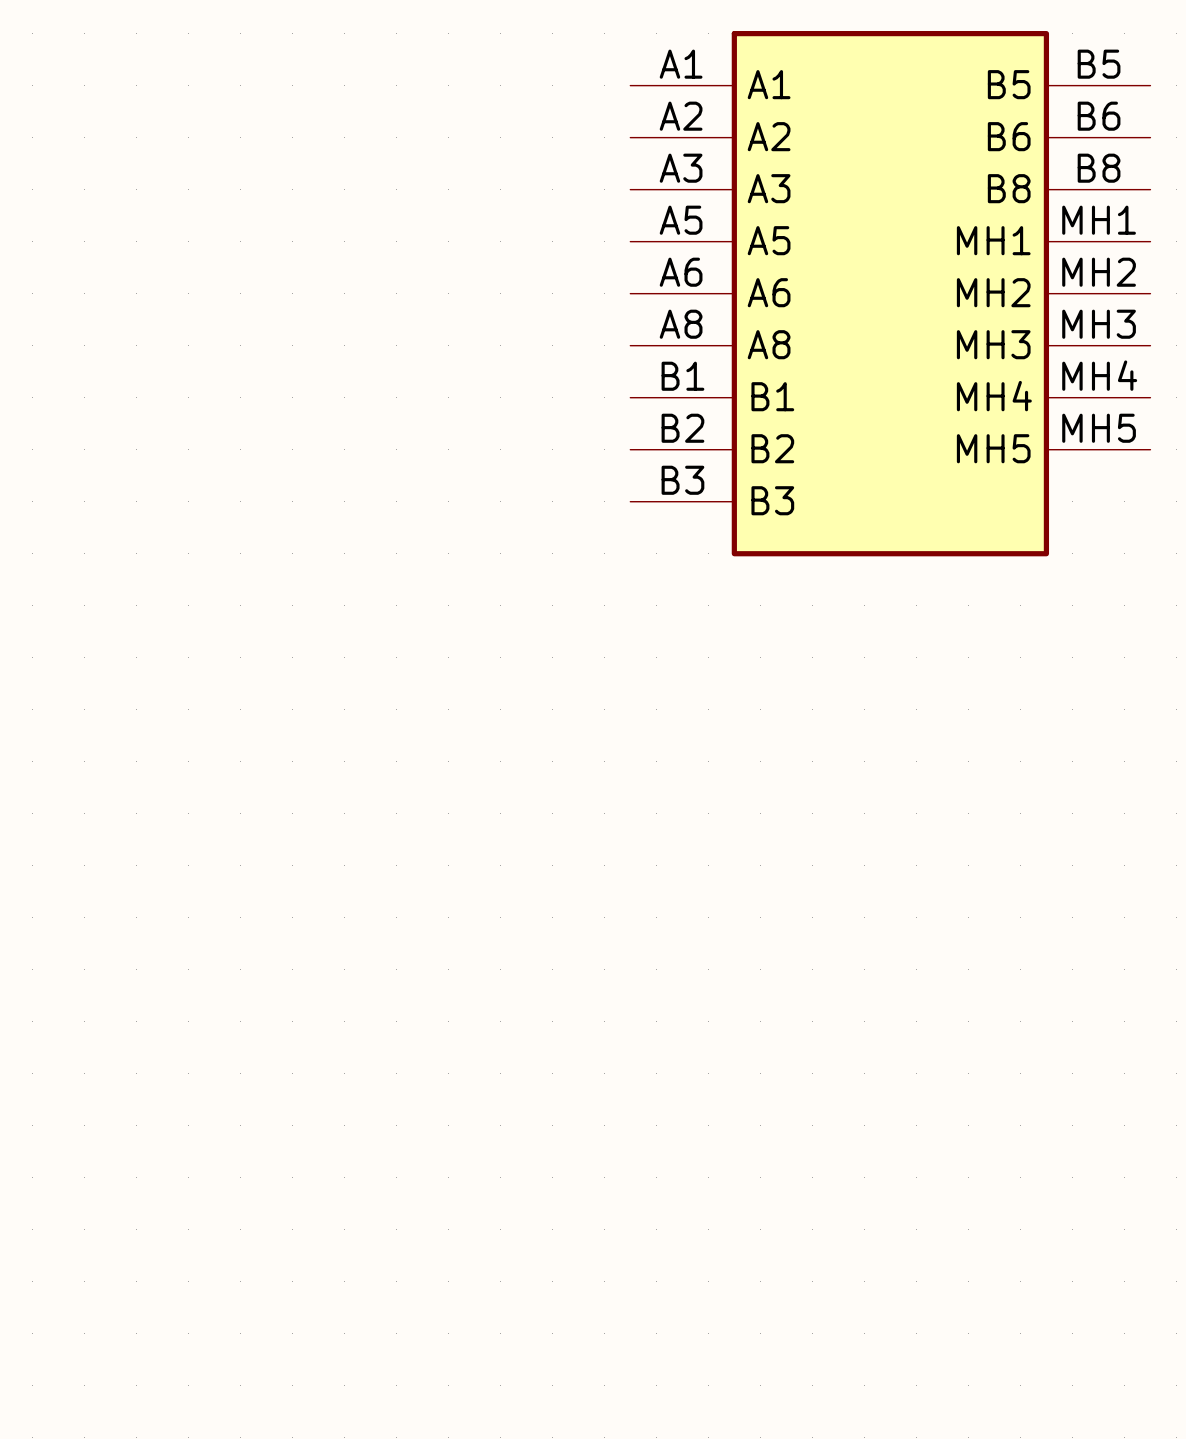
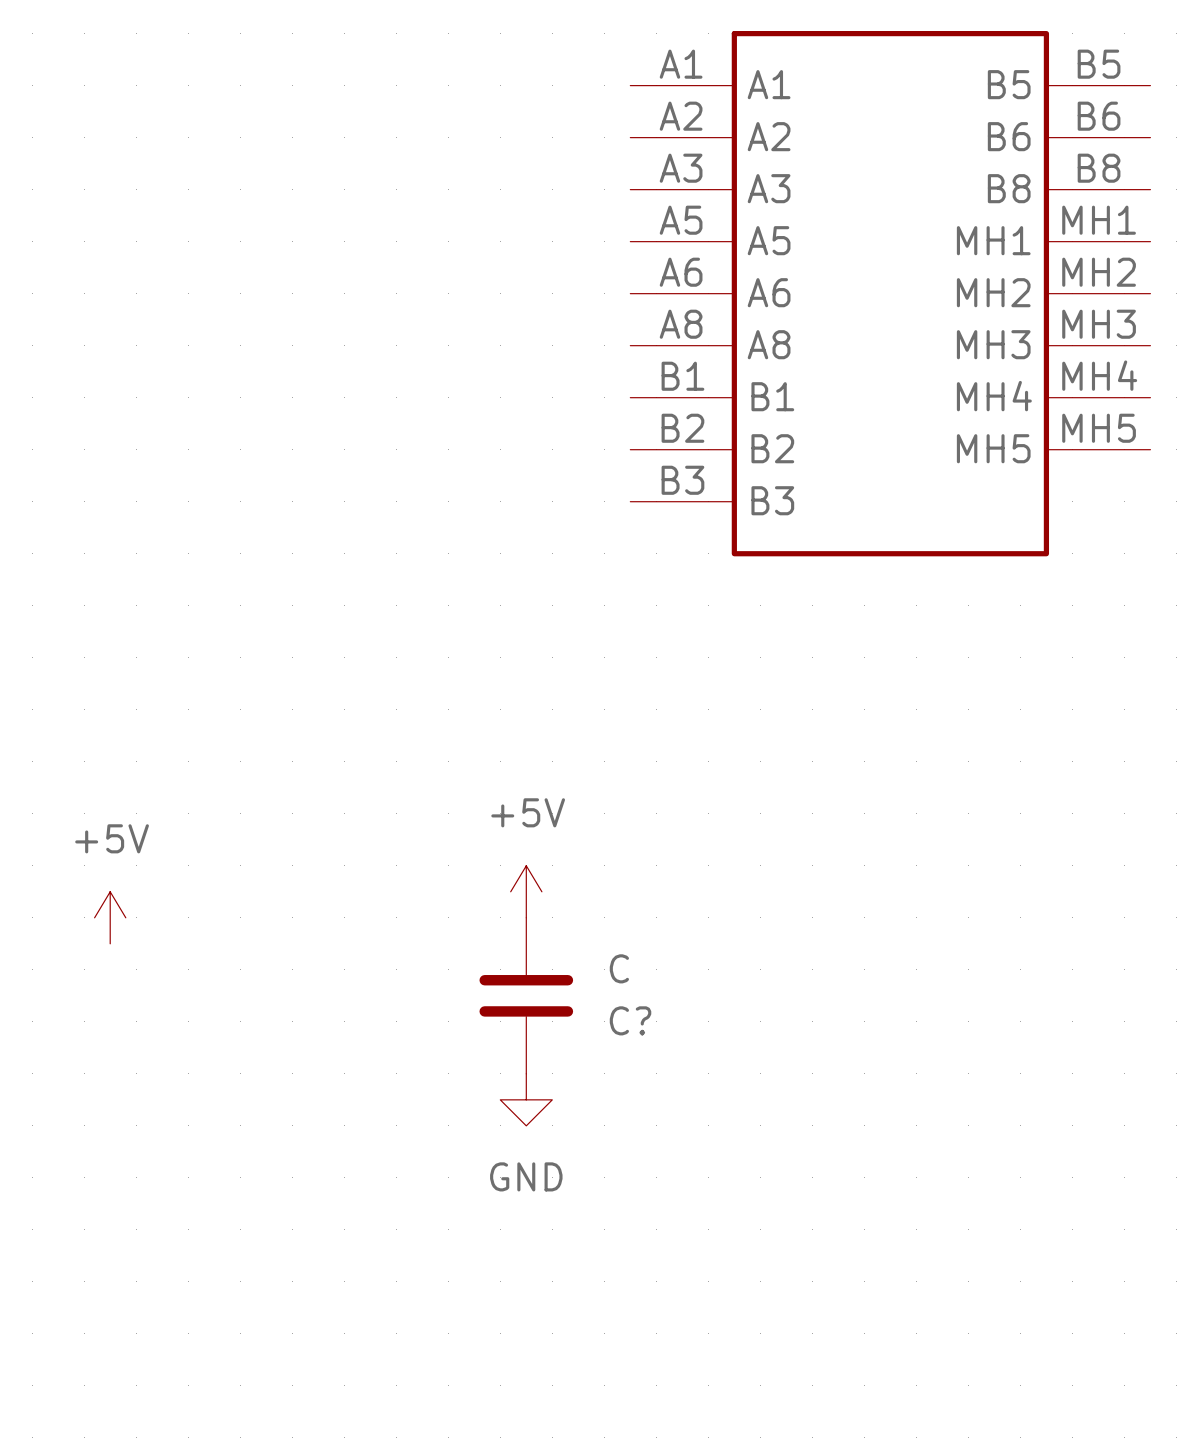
power symbol: none -> +5V (526, 891)
power symbol: none -> +5V (110, 917)
C?: none -> C (526, 995)
power symbol: none -> GND (526, 1099)

